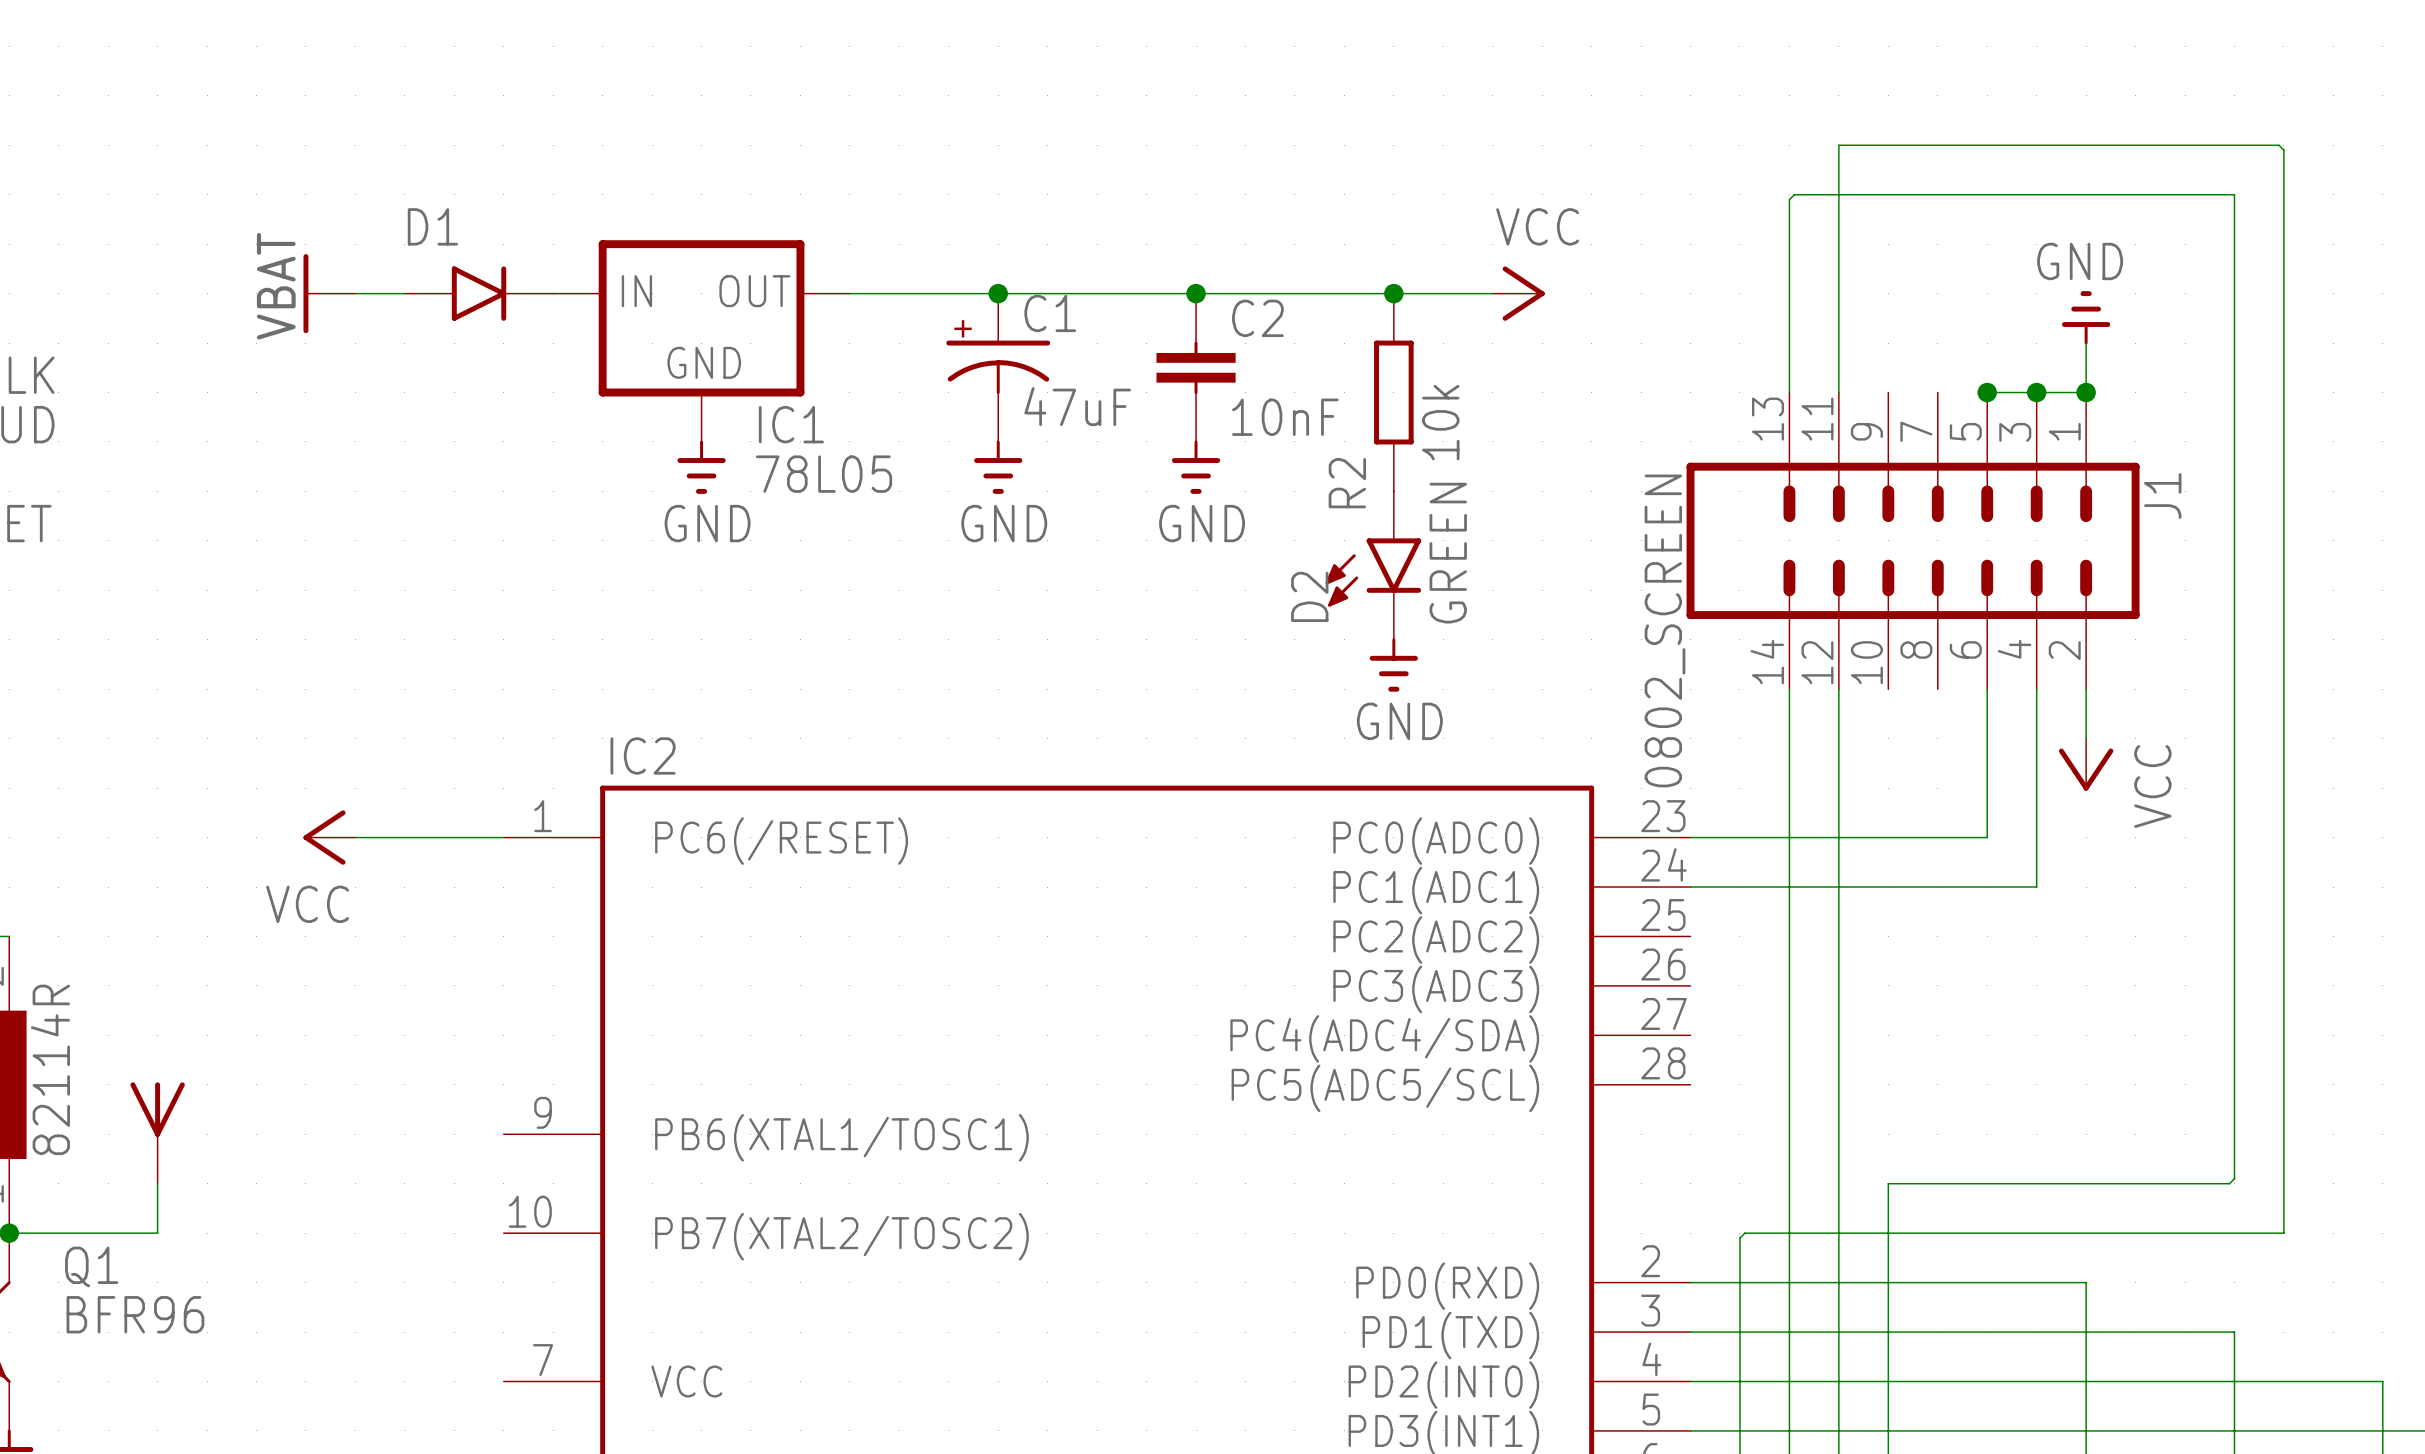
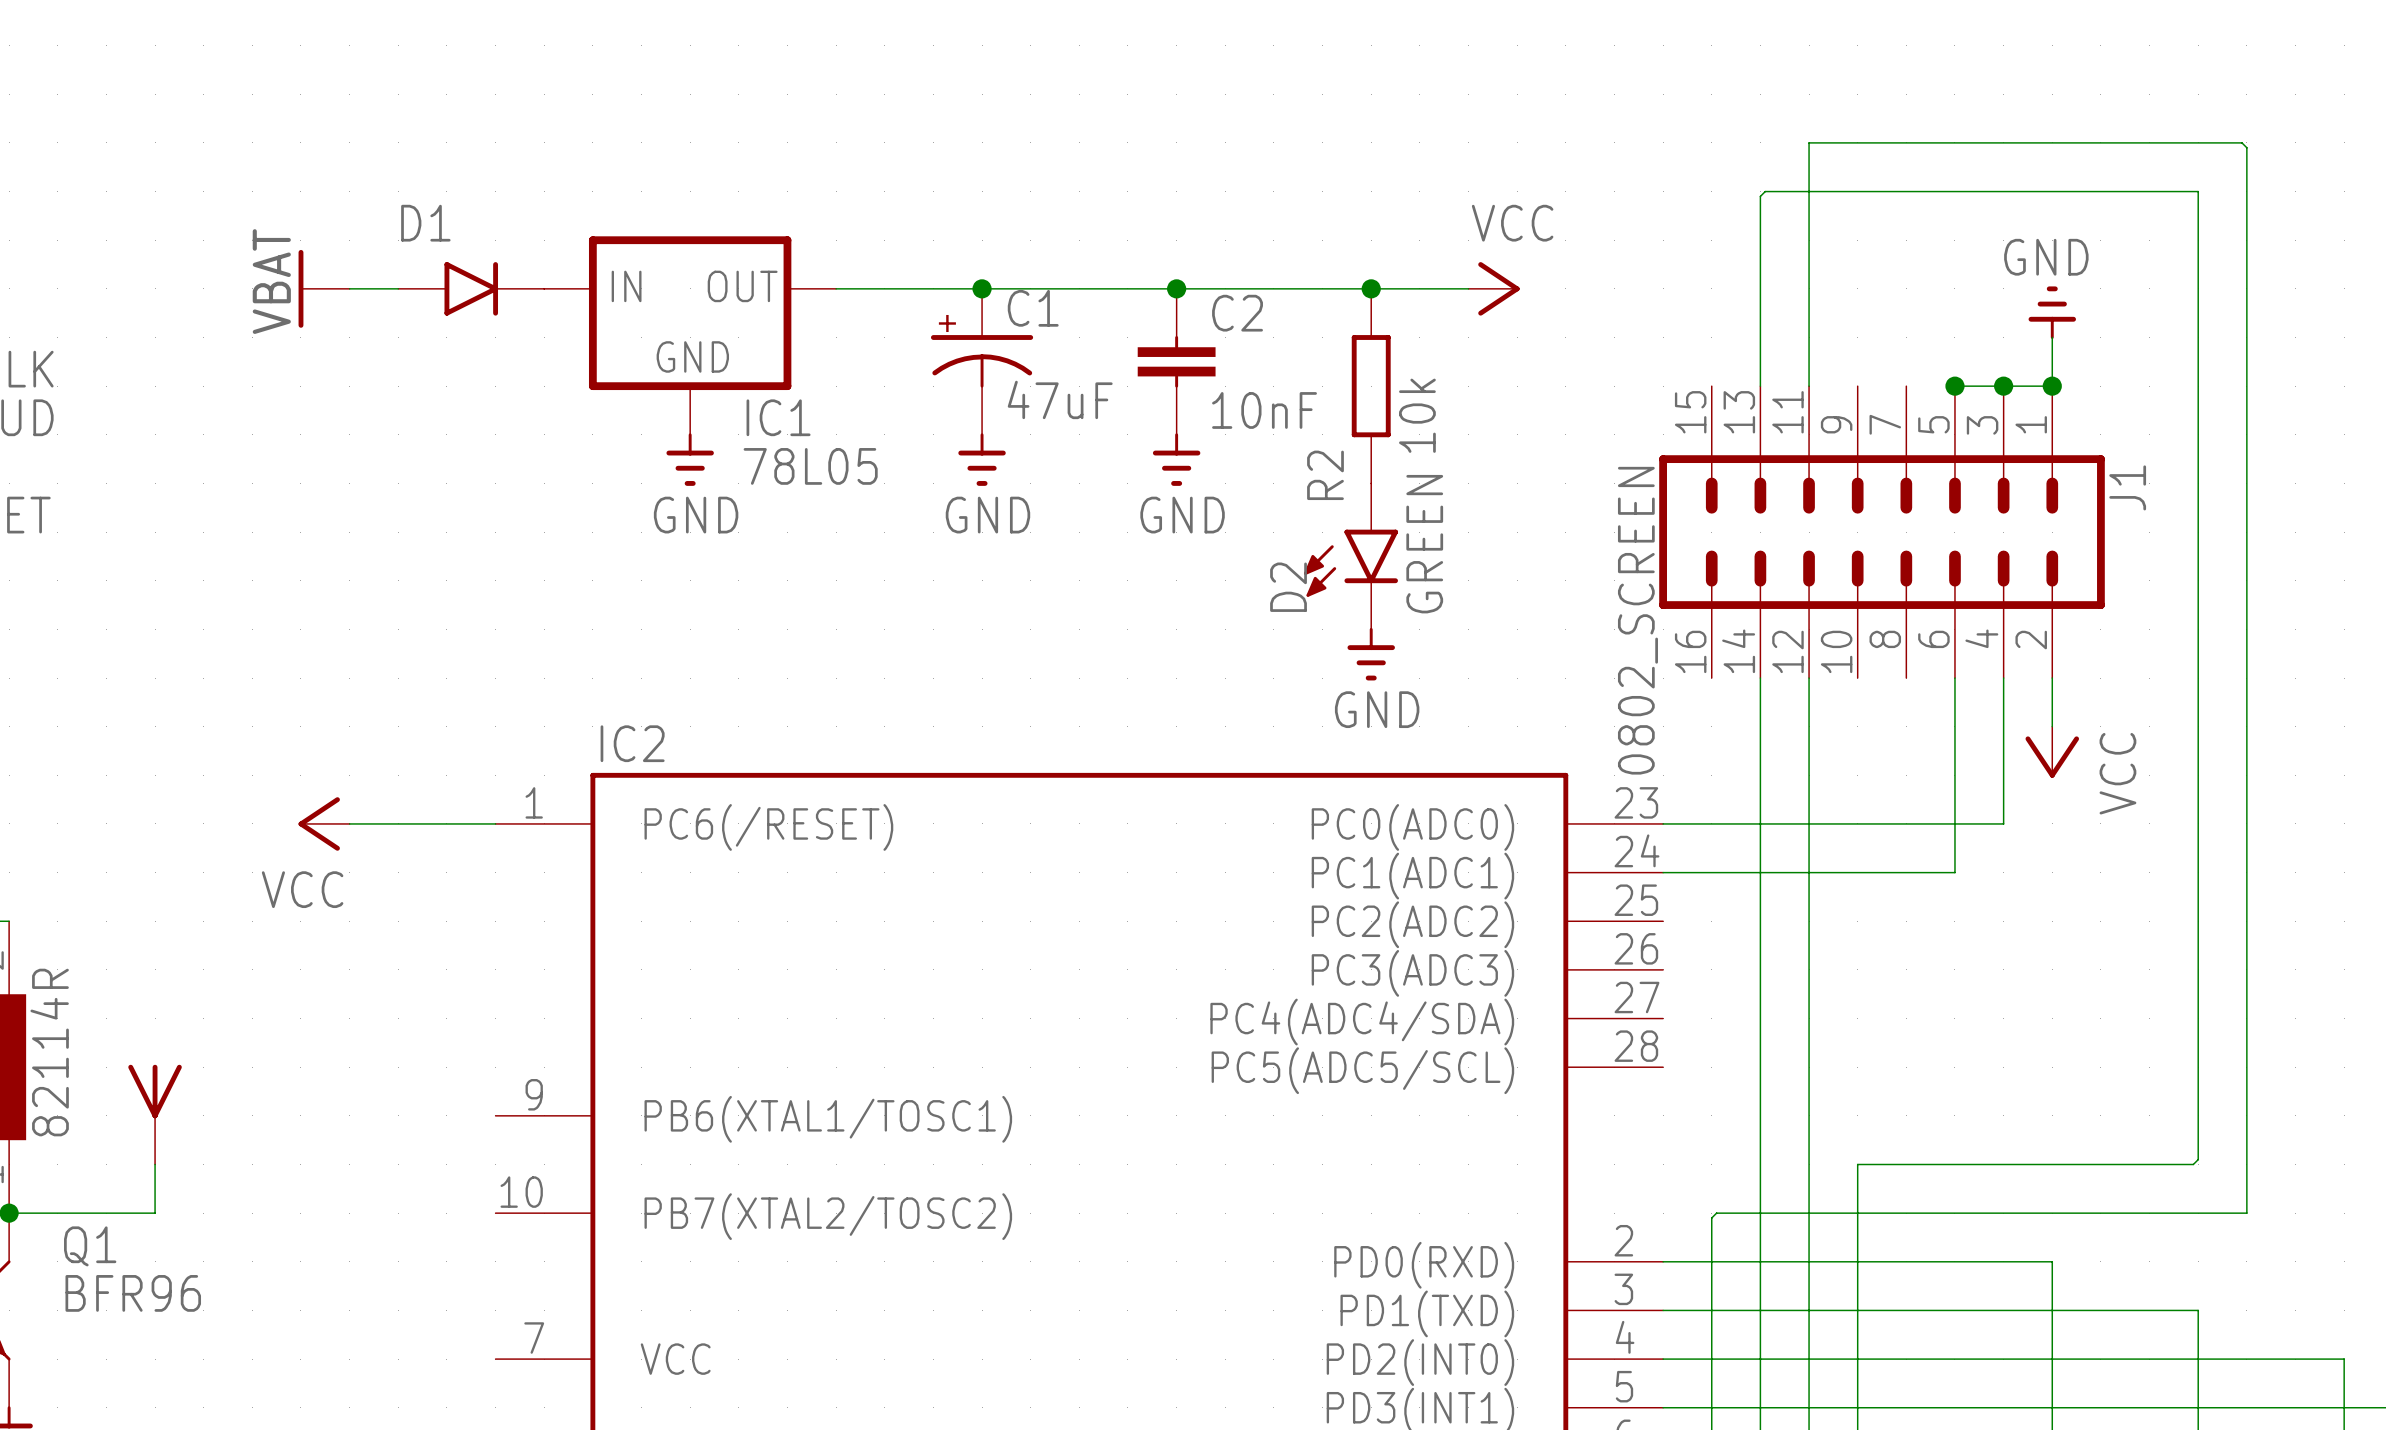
J1 symbol: [1686, 392, 2140, 690] -> [1659, 386, 2105, 679]
wire: (2036, 837) (2036, 887) (1987, 887) -> (2003, 823) (1954, 823) (1954, 872)

